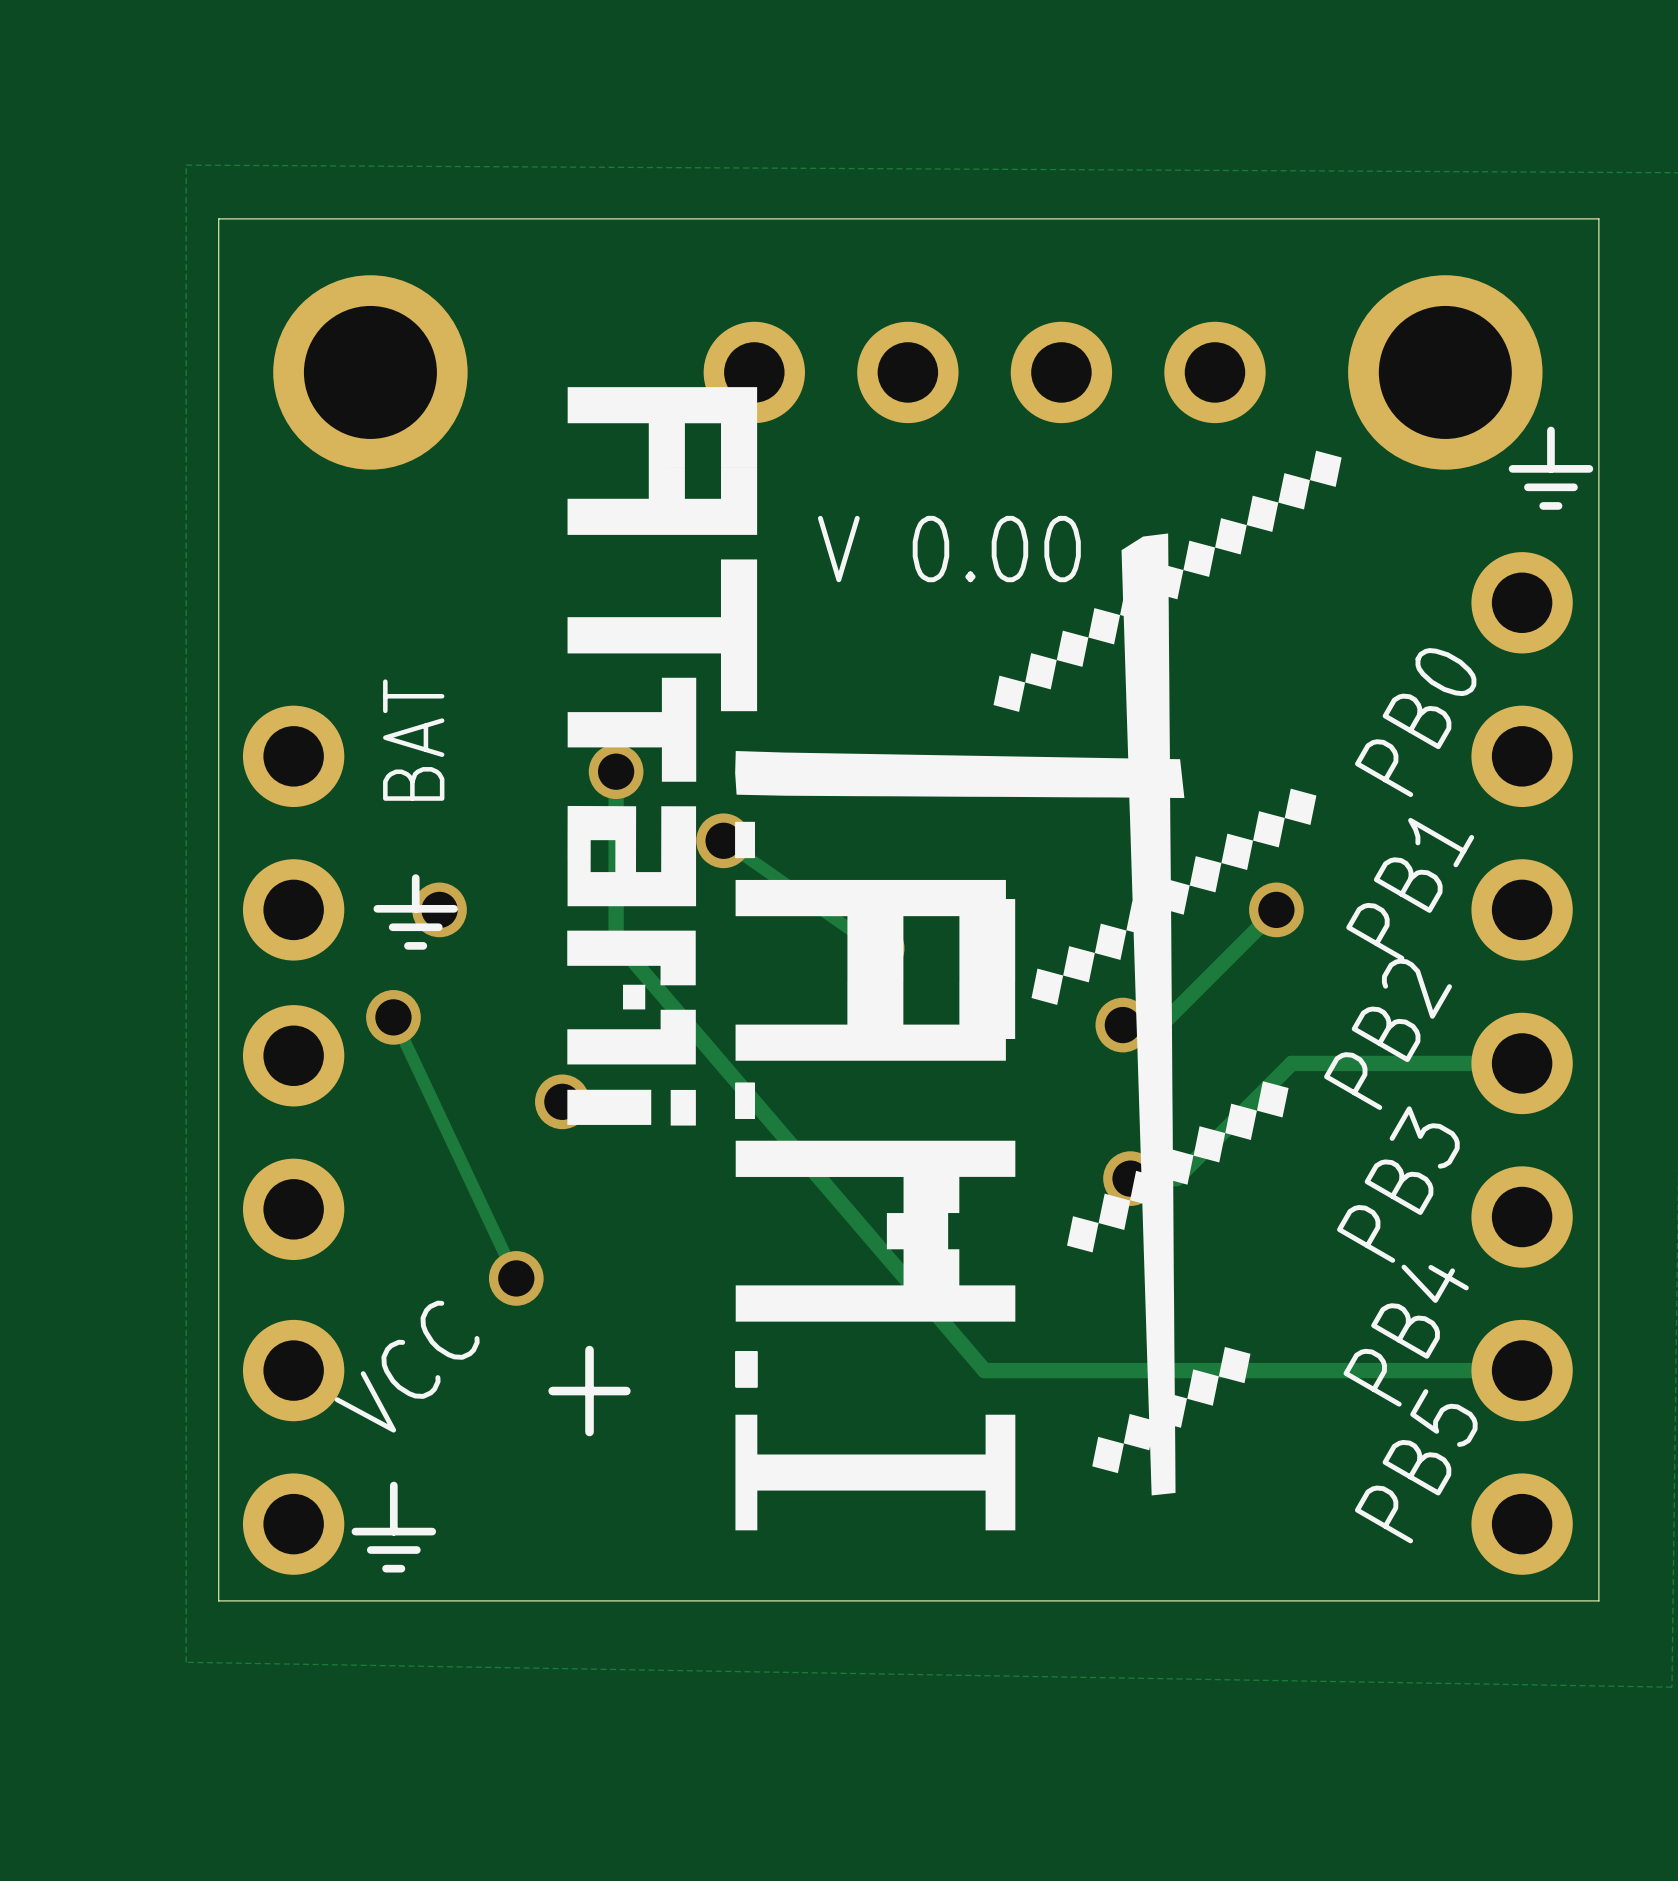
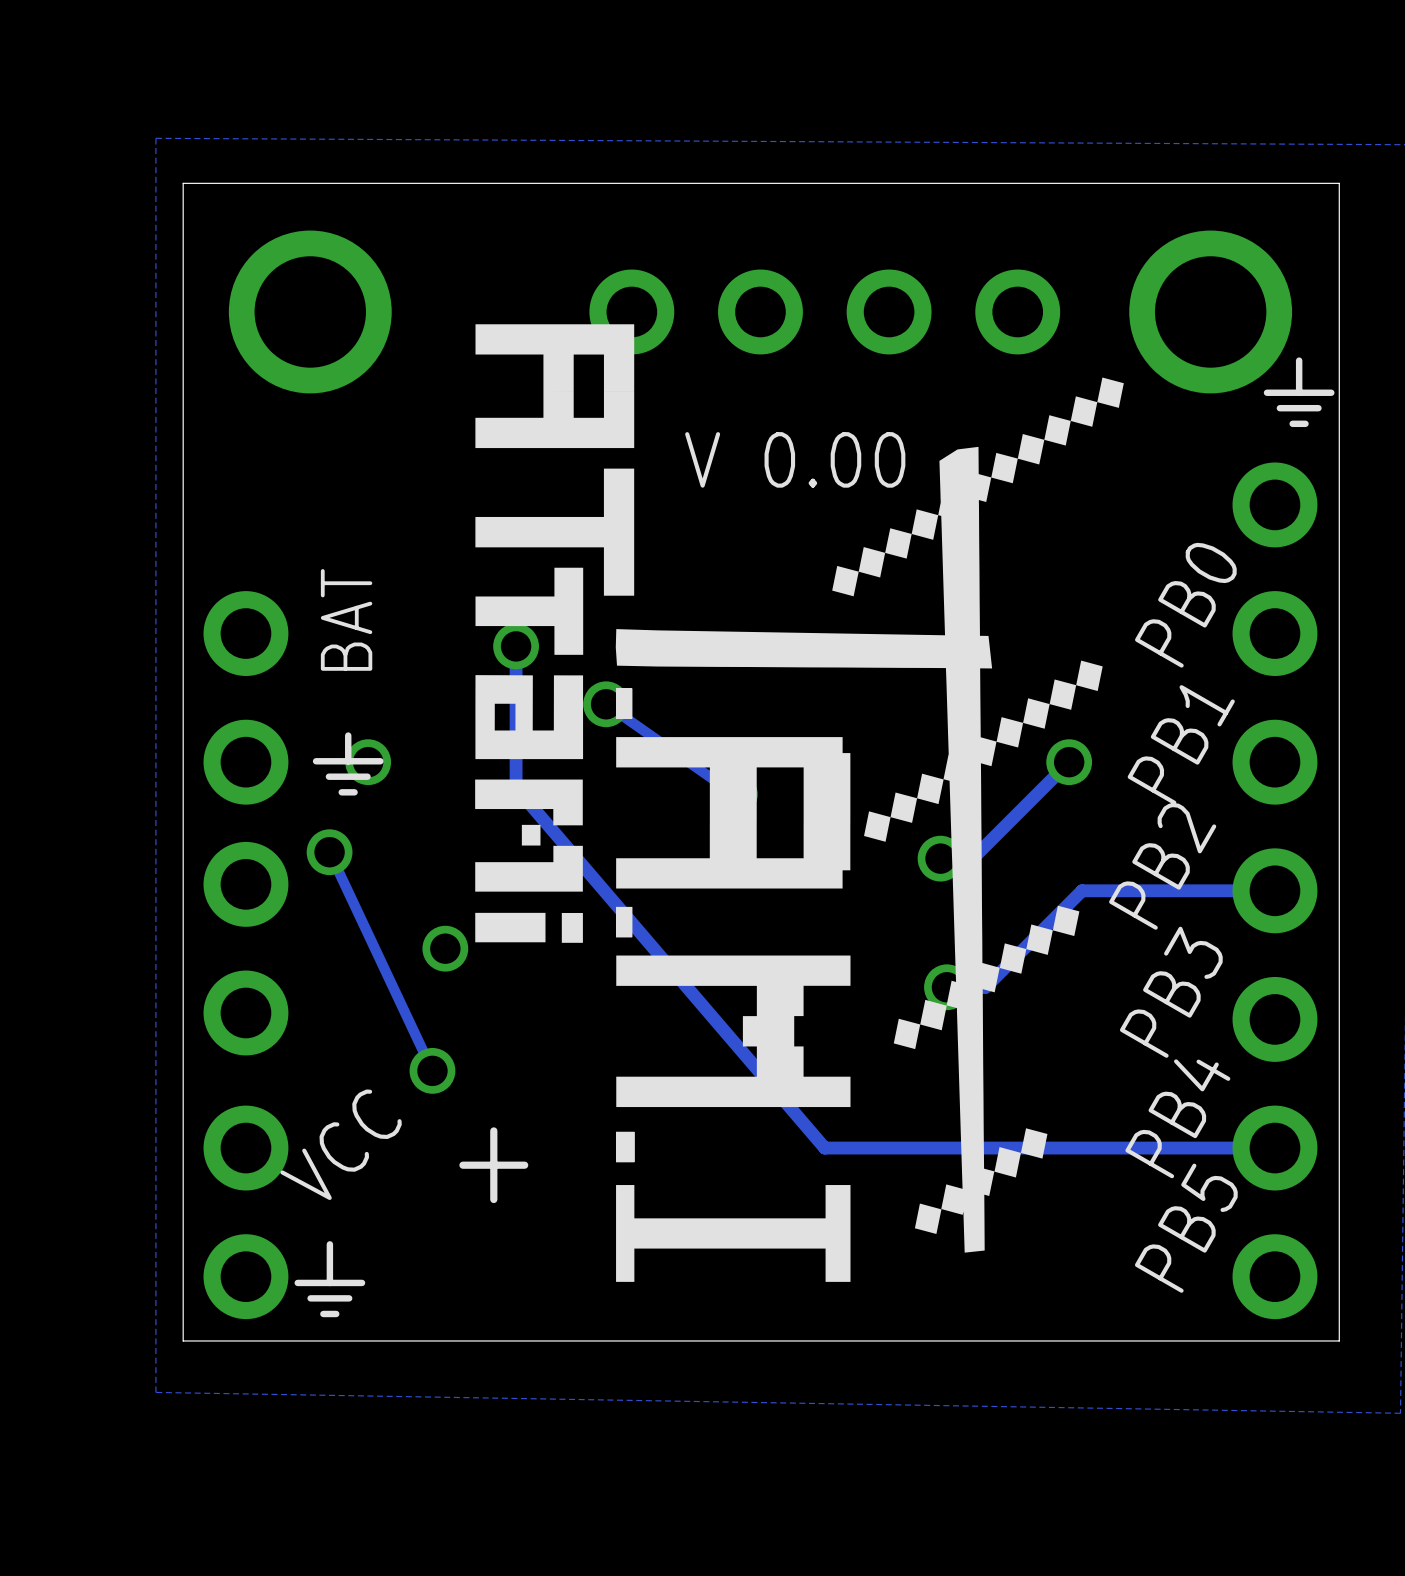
via position: (562, 1101) -> (445, 948)

